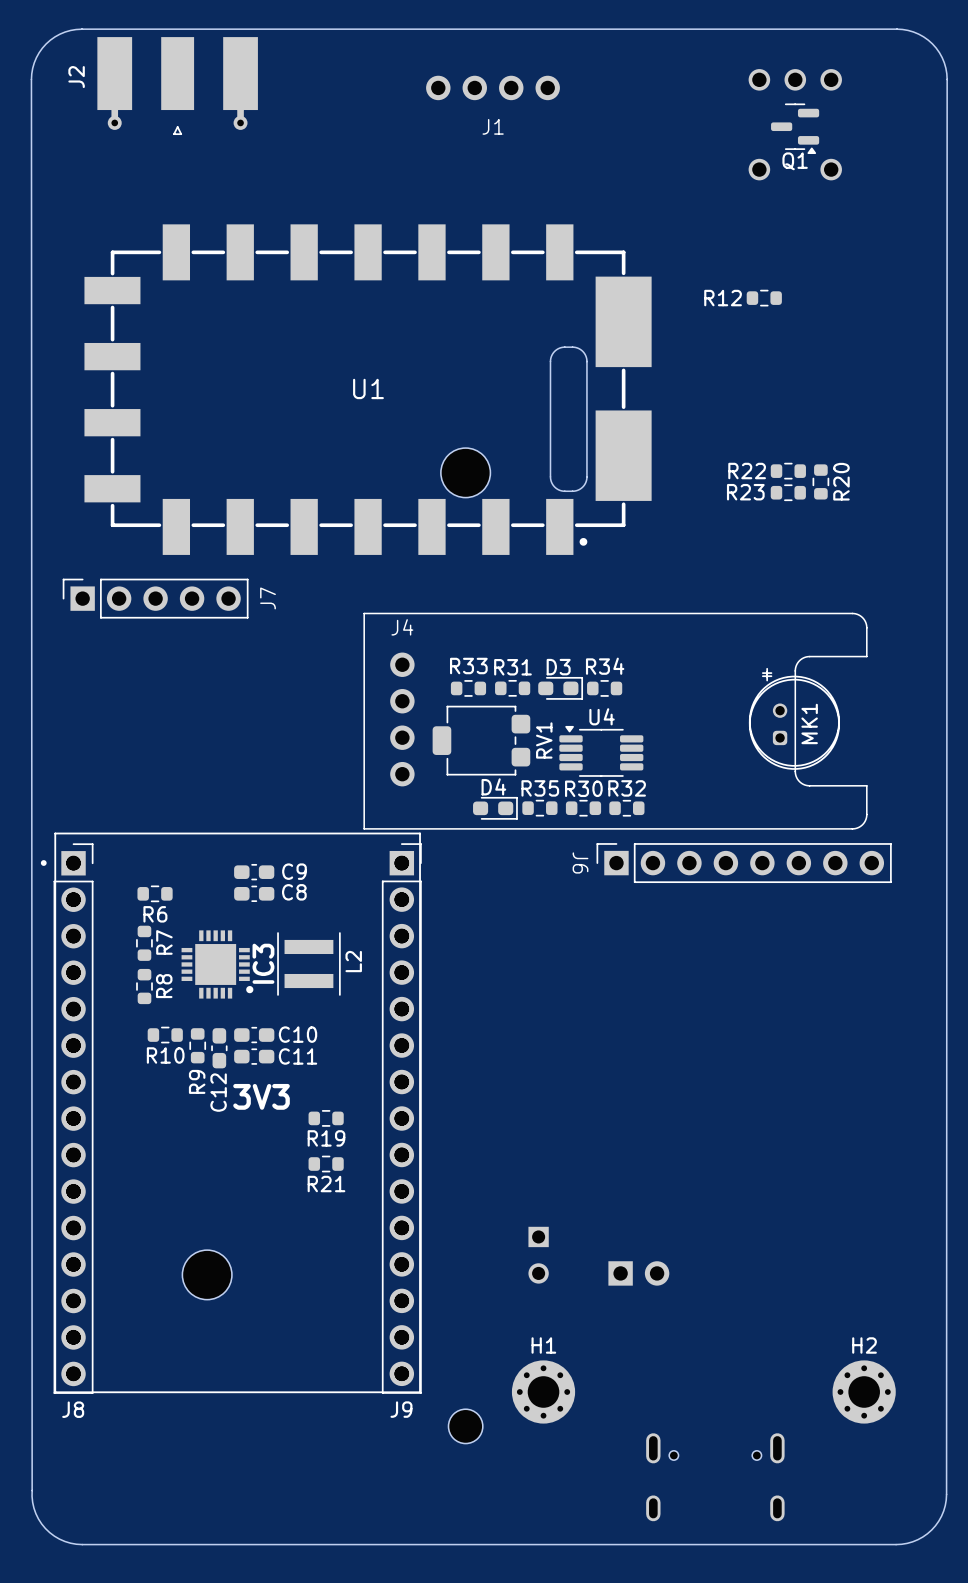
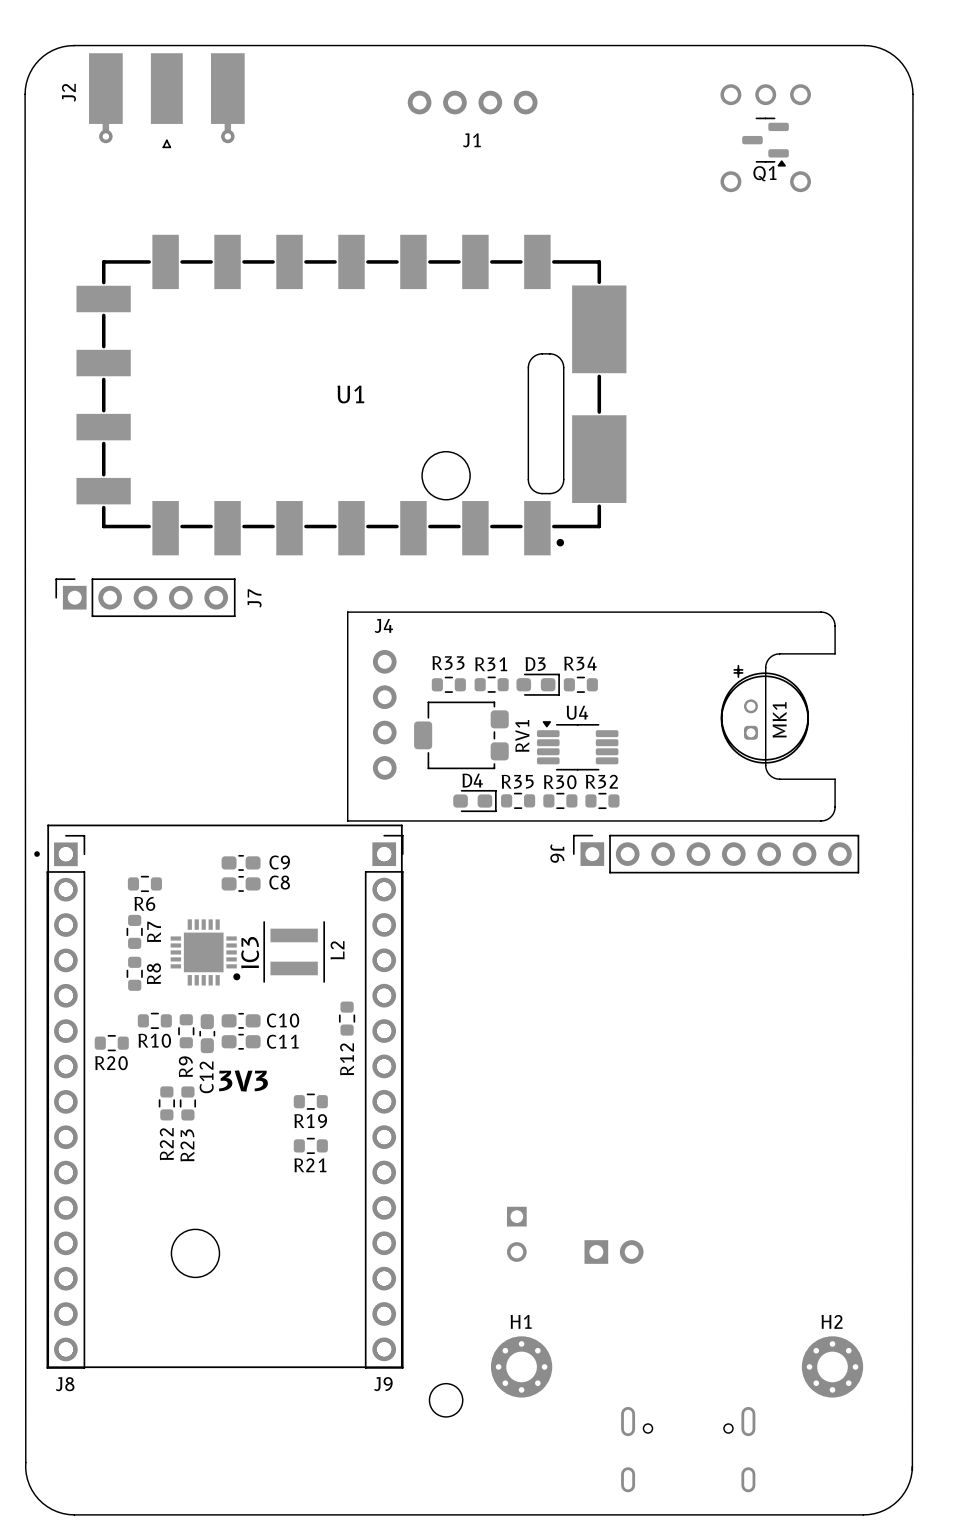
R12 name position: R12 (723, 298) -> R12 (347, 1059)
R12 rotation: 0° (764, 298) -> 90° clockwise (347, 1018)
R12 position: (764, 298) -> (347, 1018)
R22 name position: R22 (747, 471) -> R22 (166, 1144)
R22 rotation: 0° (788, 471) -> 90° clockwise (166, 1103)
R22 position: (788, 471) -> (166, 1103)
R20 rotation: 0° (820, 481) -> 90° clockwise (111, 1043)
R20 position: (820, 481) -> (111, 1043)
R23 name position: R23 (745, 492) -> R23 (187, 1145)
R23 rotation: 0° (788, 492) -> 90° clockwise (187, 1103)
R23 position: (788, 492) -> (187, 1103)

